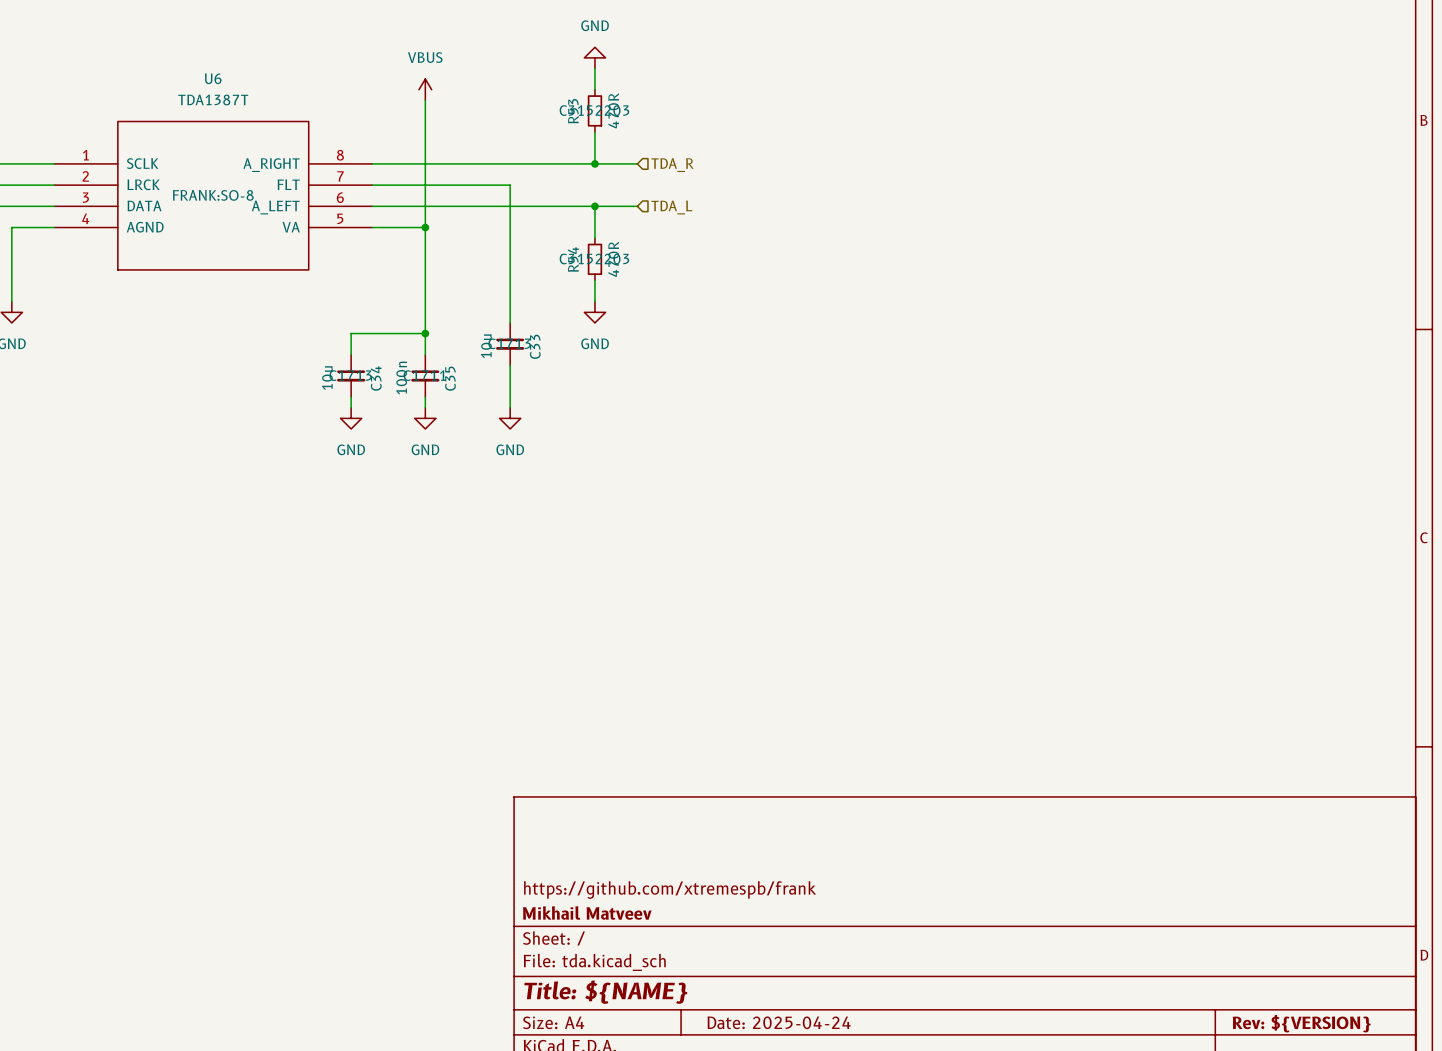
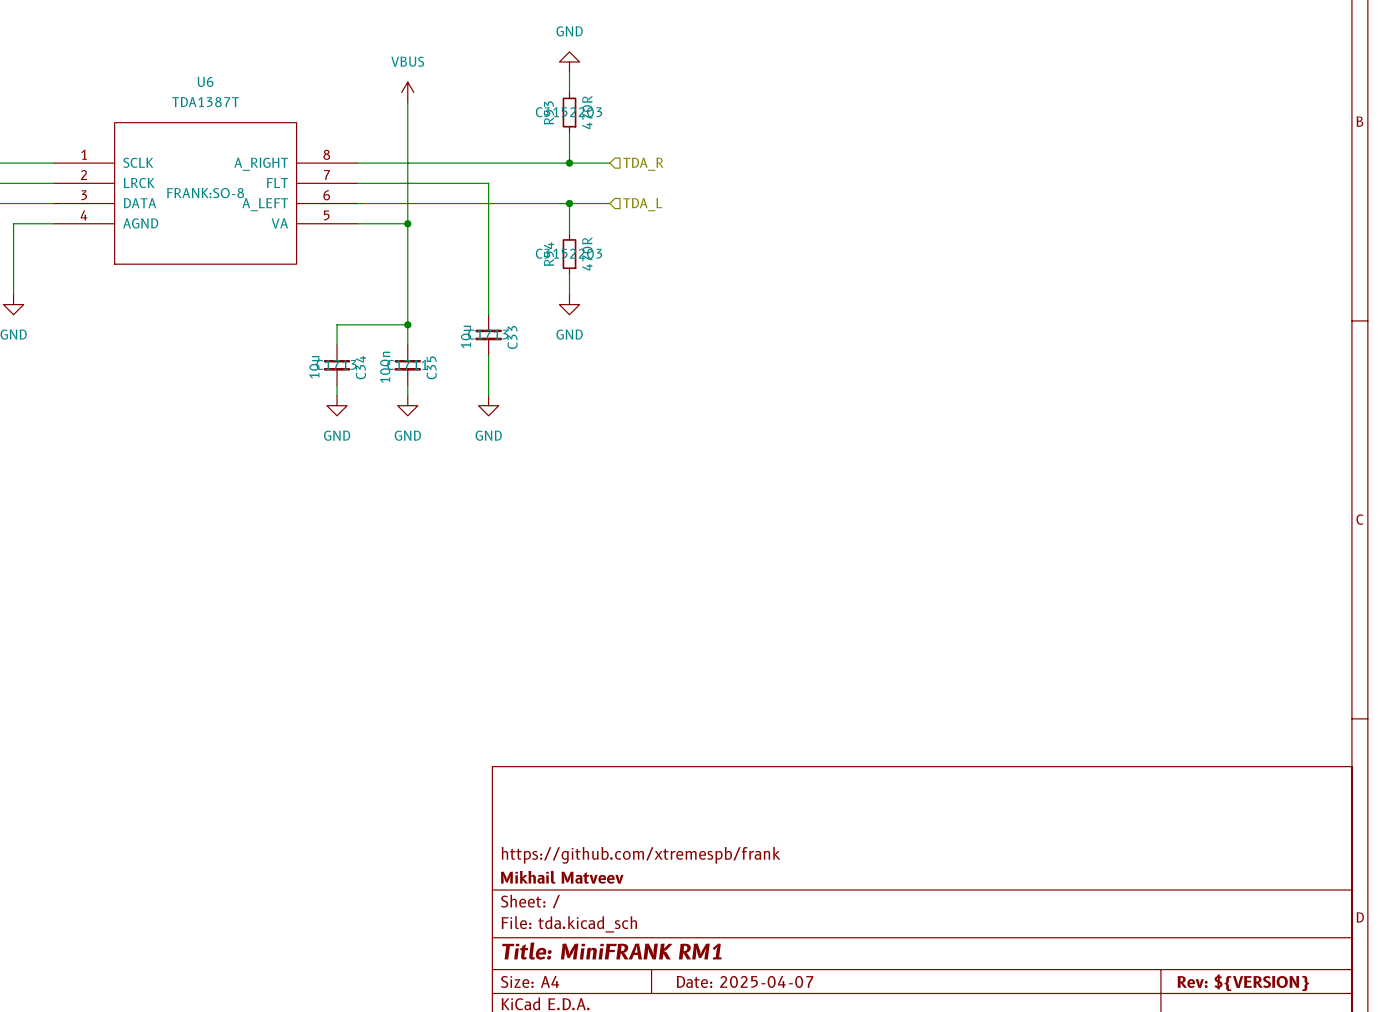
title block: Title: ${NAME} (605, 992) -> Title: MiniFRANK RM1 (611, 951)
title block: Date: 2025-04-24 (779, 1022) -> Date: 2025-04-07 (745, 981)

